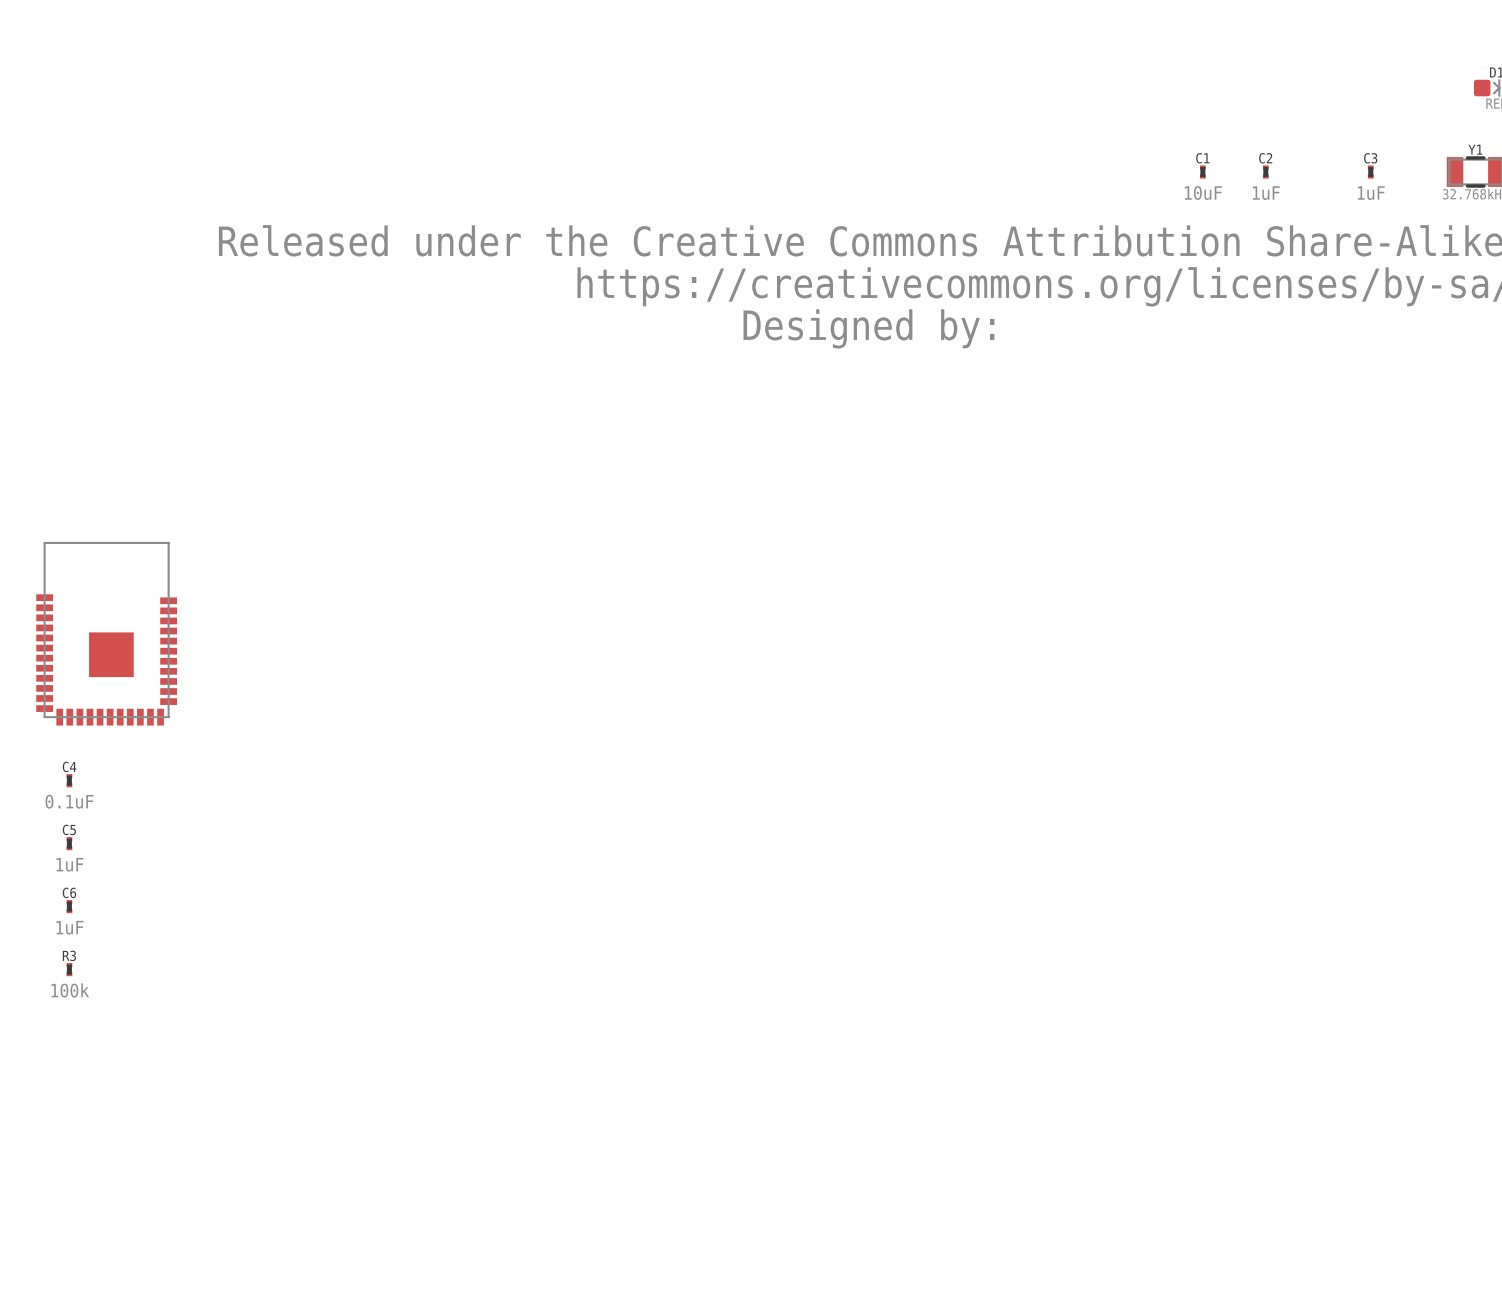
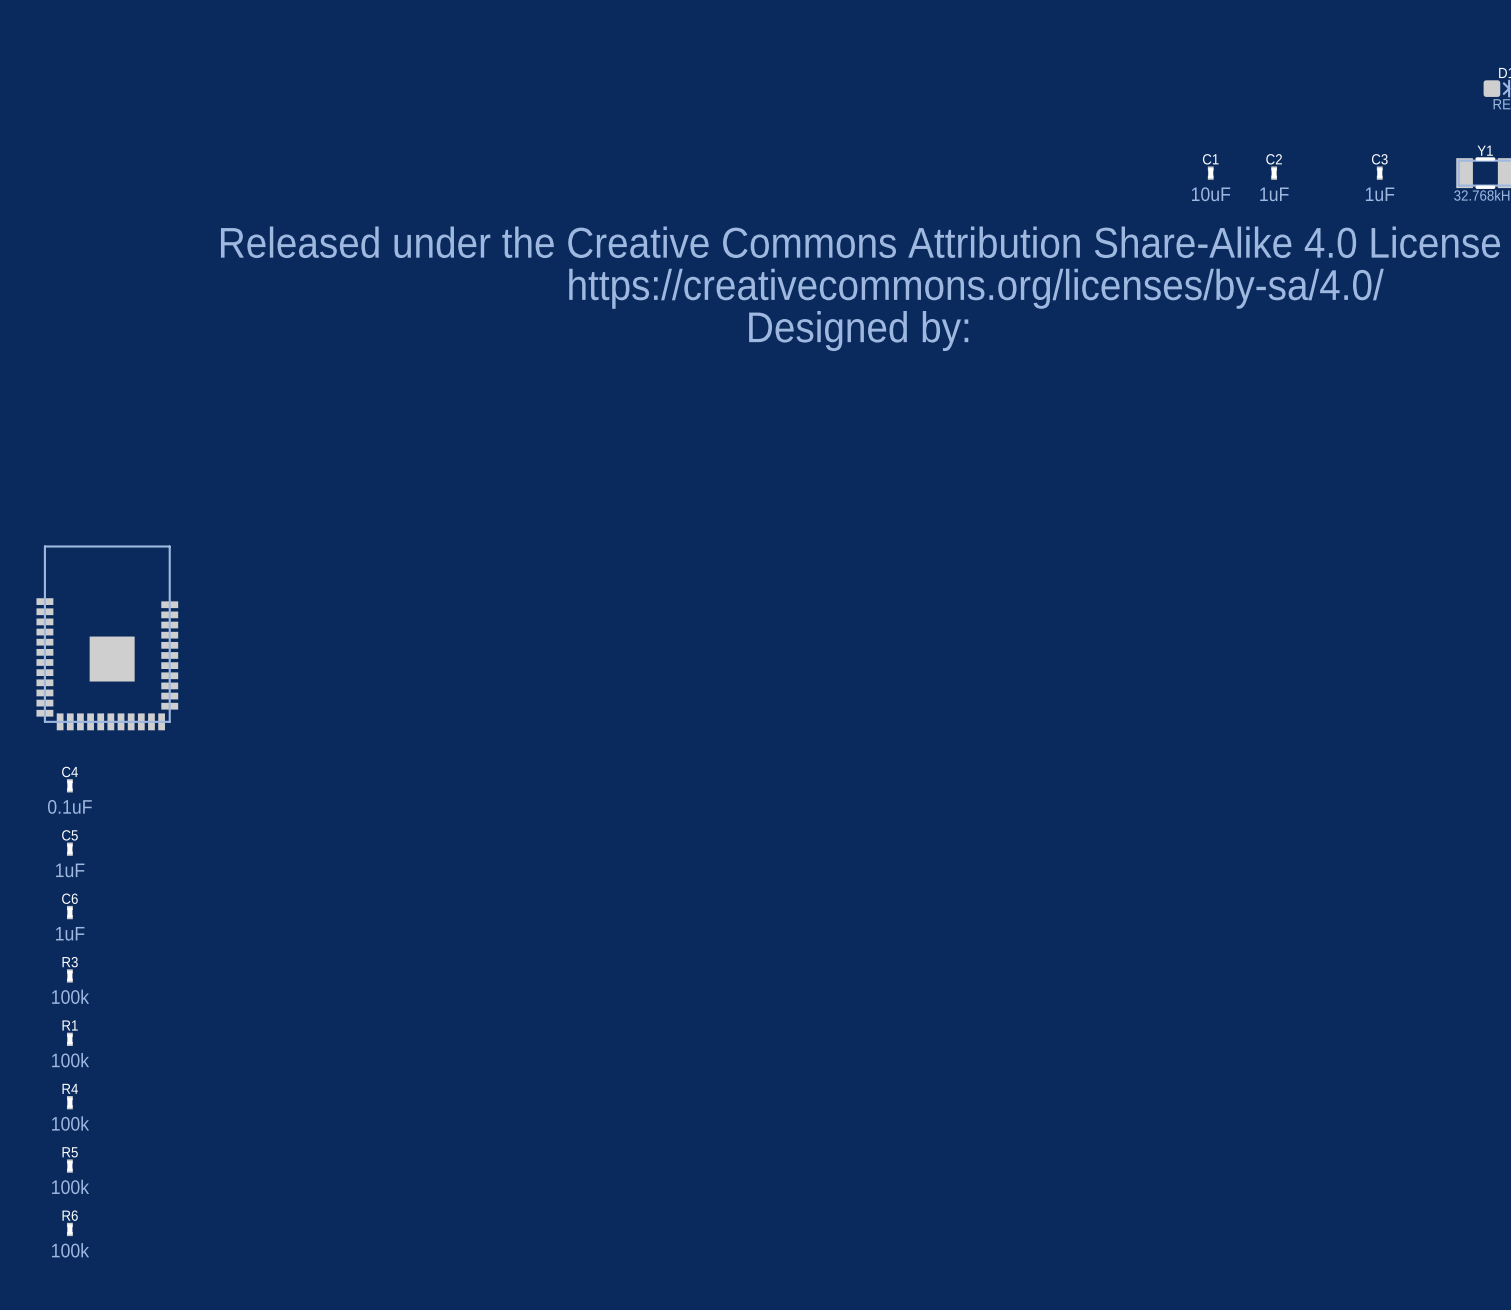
R1: none -> 100k (69, 1039)
R4: none -> 100k (69, 1102)
R5: none -> 100k (69, 1166)
R6: none -> 100k (69, 1229)

